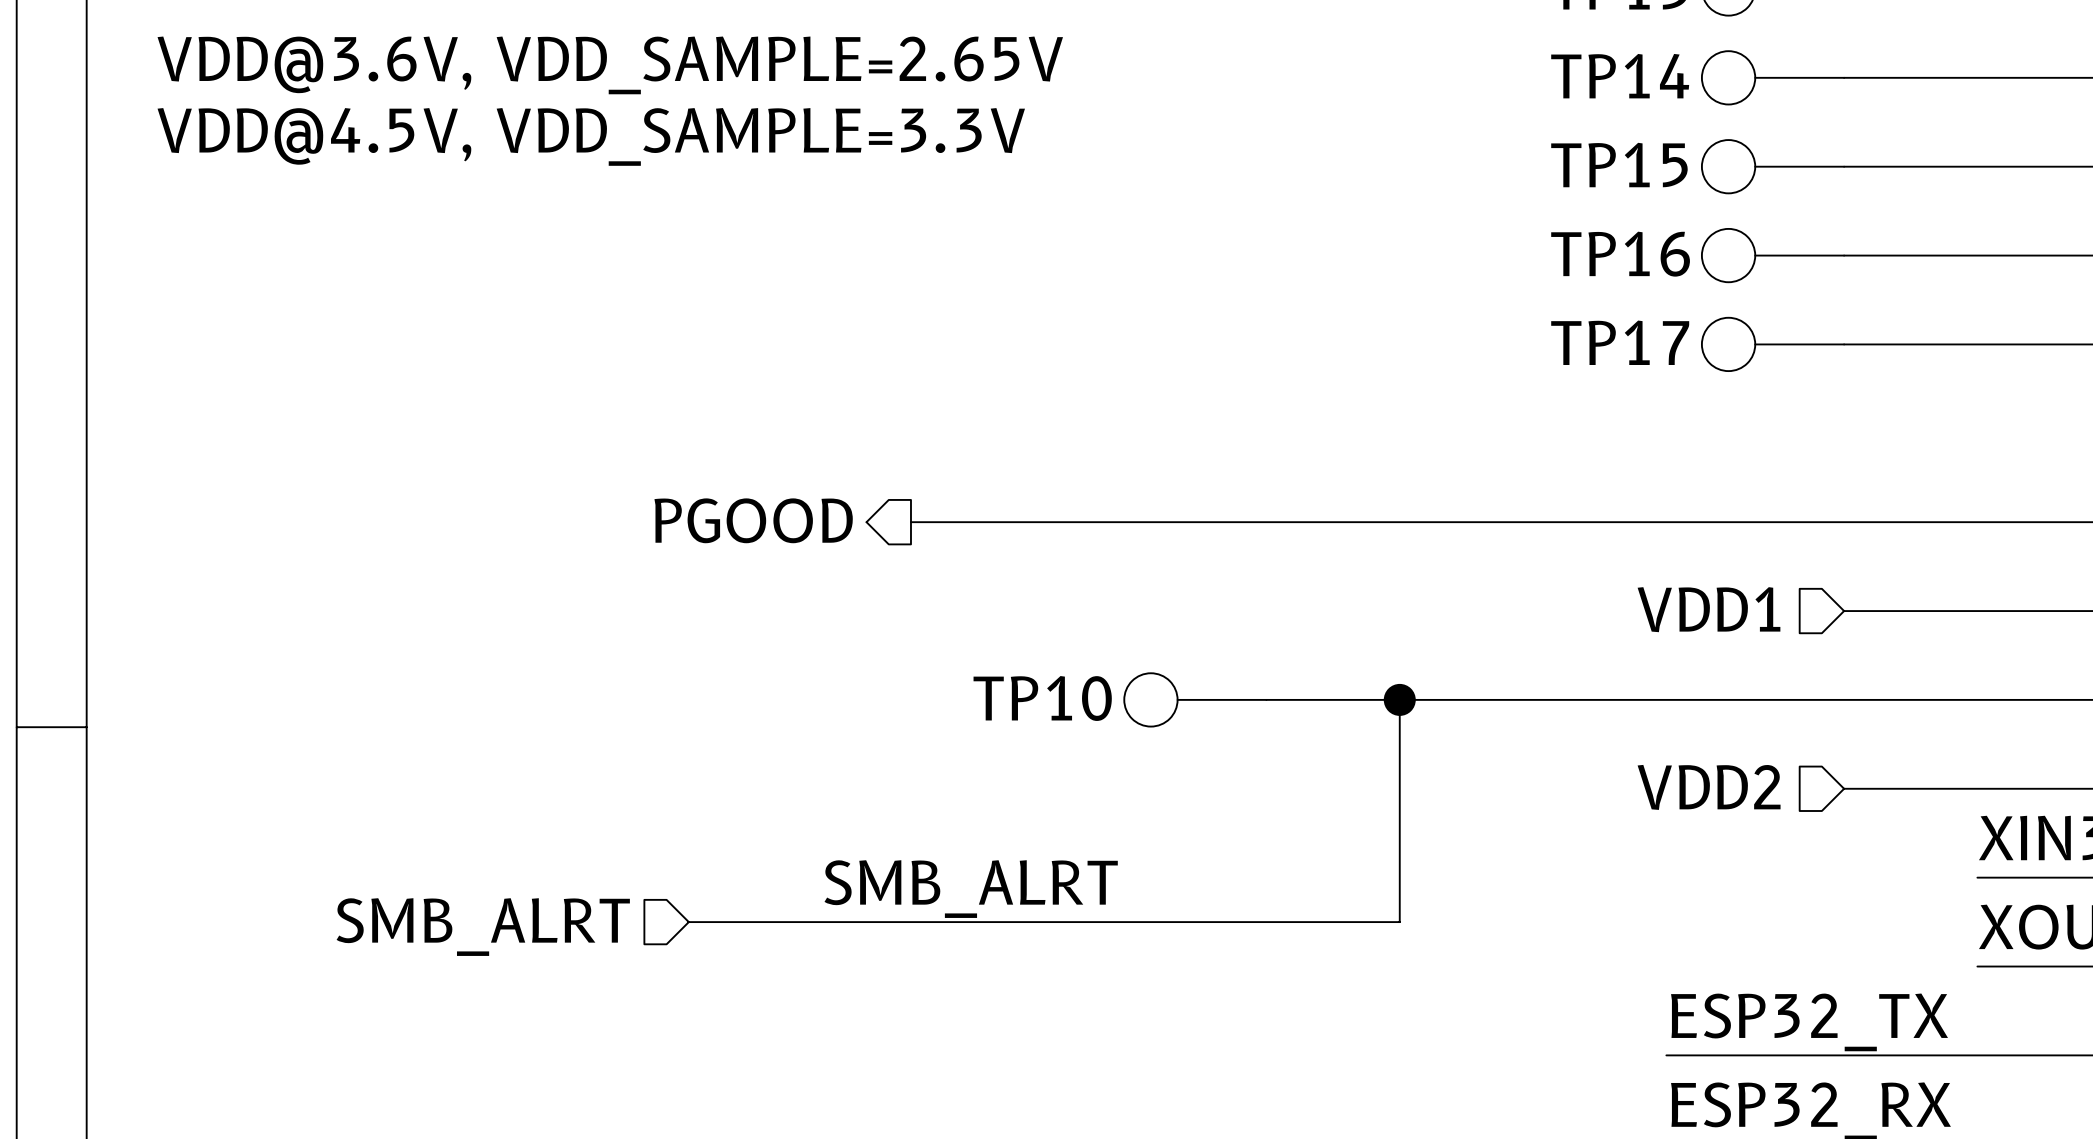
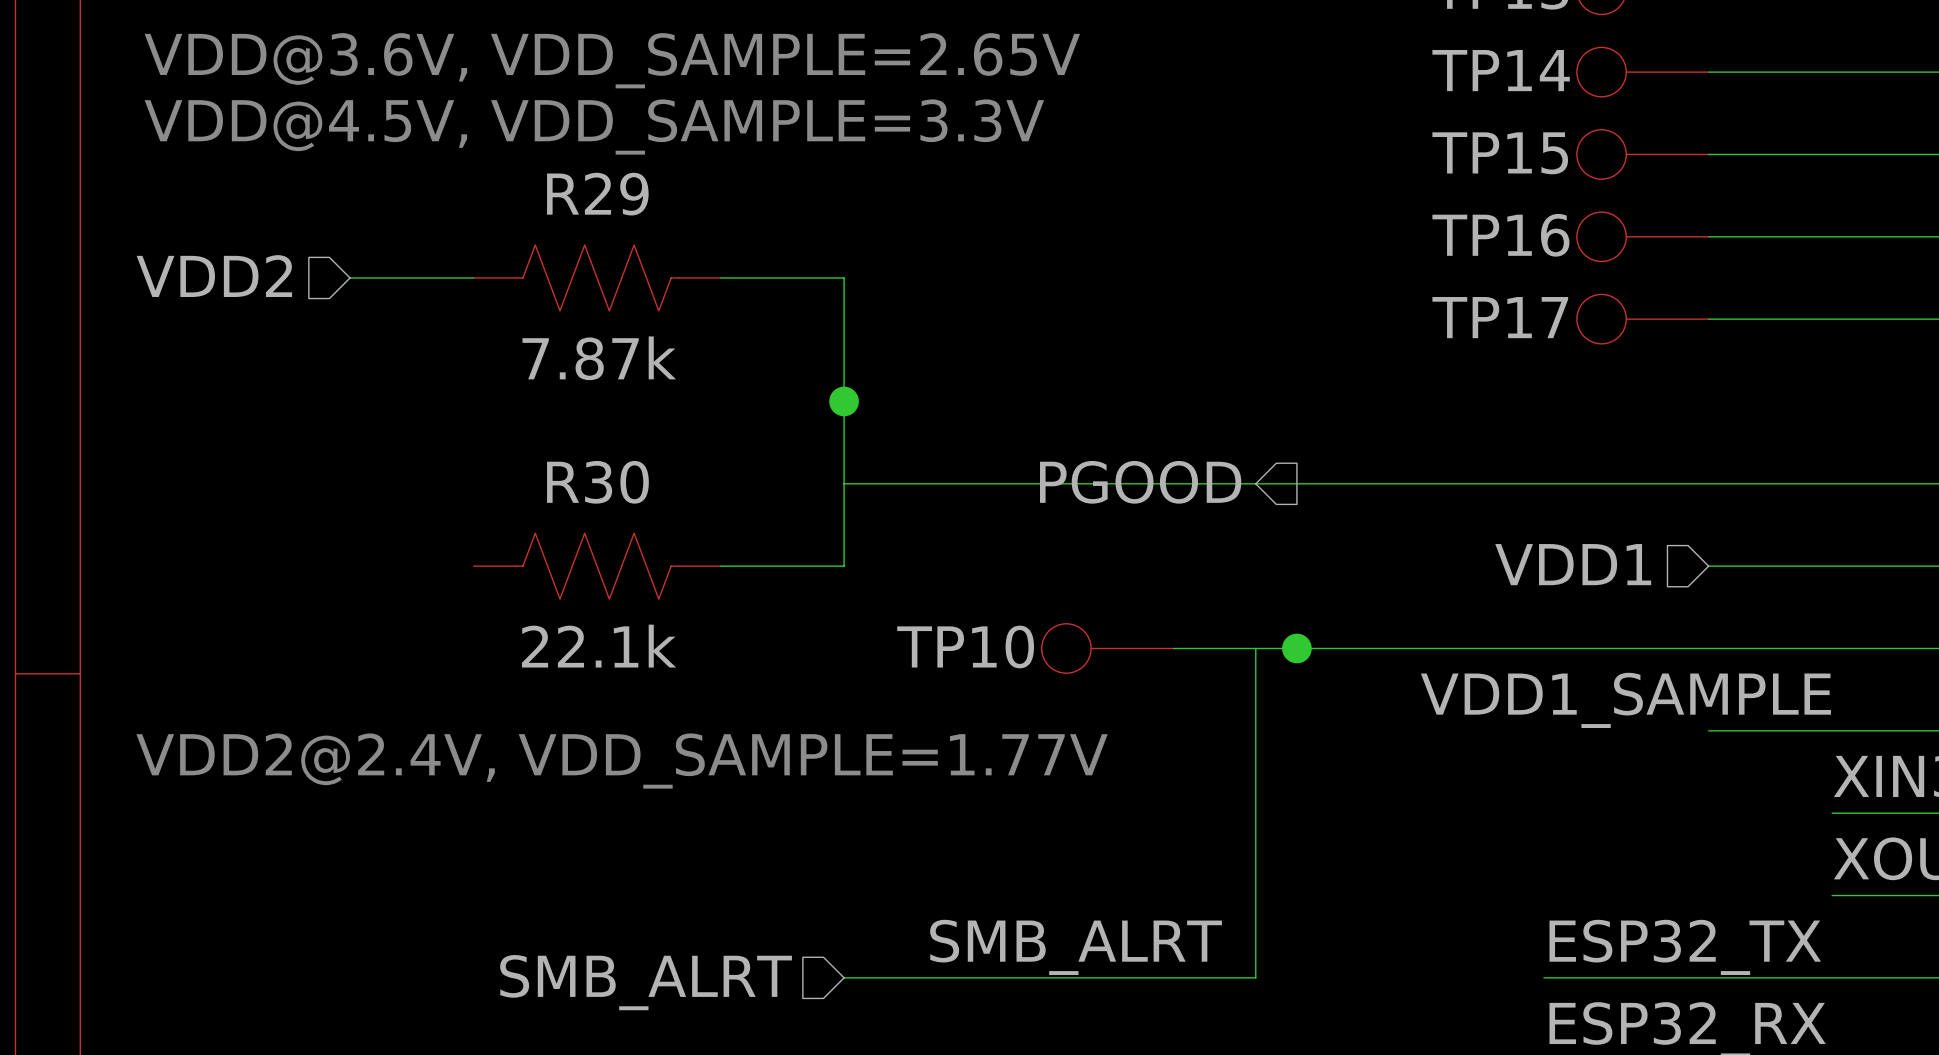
hierarchical label: none -> VDD2 (214, 276)
wire: none -> (350, 277) (473, 277)
R29: none -> 7.87k (597, 277)
wire: none -> (720, 277) (844, 277) (844, 566) (720, 566)
junction: none -> (844, 401)
hierarchical label position: PGOOD (753, 520) -> PGOOD (1140, 482)
R30: none -> 22.1k (597, 566)
wire: none -> (1255, 648) (1255, 977) (844, 977)
wire: (1399, 699) (1399, 922) (688, 922) -> none
label: none -> VDD1_SAMPLE (1625, 700)
hierarchical label: VDD2 (1709, 787) -> none
text: none -> VDD2@2.4V, VDD_SAMPLE=1.77V (622, 761)
label position: SMB_ALRT (971, 889) -> SMB_ALRT (1076, 947)
hierarchical label position: SMB_ALRT (483, 927) -> SMB_ALRT (646, 982)

